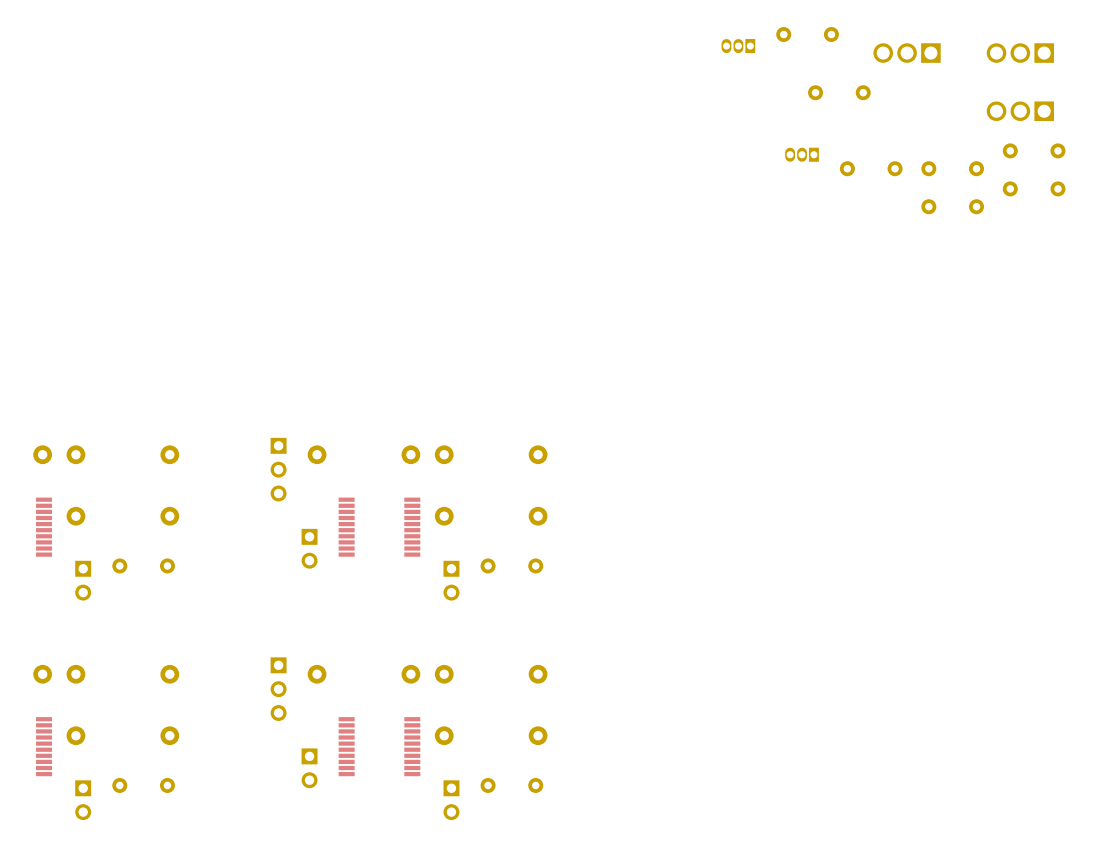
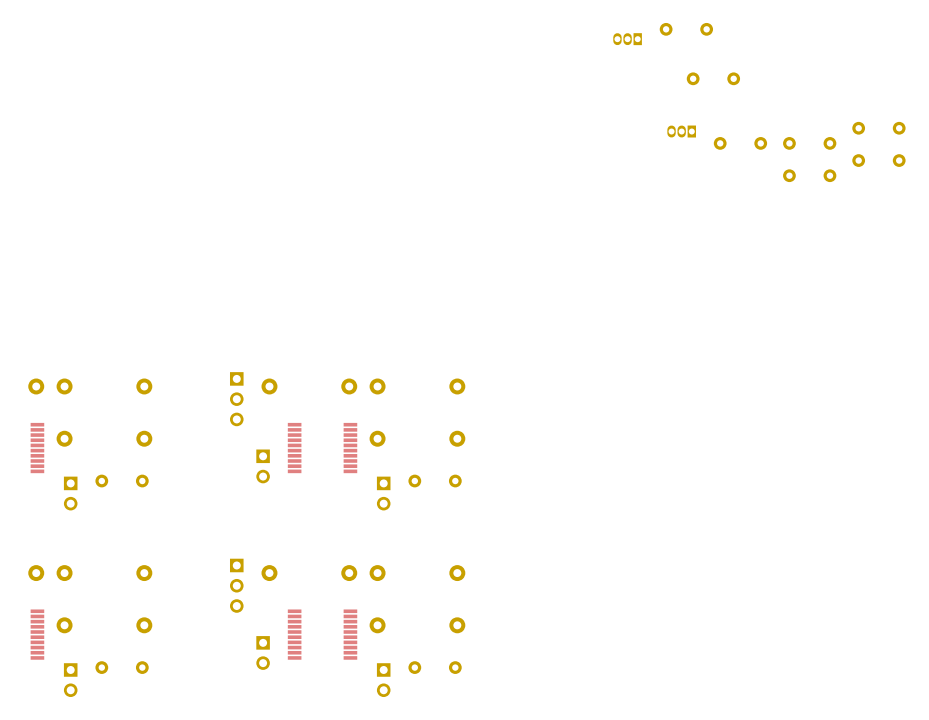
part: (907, 53) -> none
part: (1020, 53) -> none
part: (1020, 111) -> none

